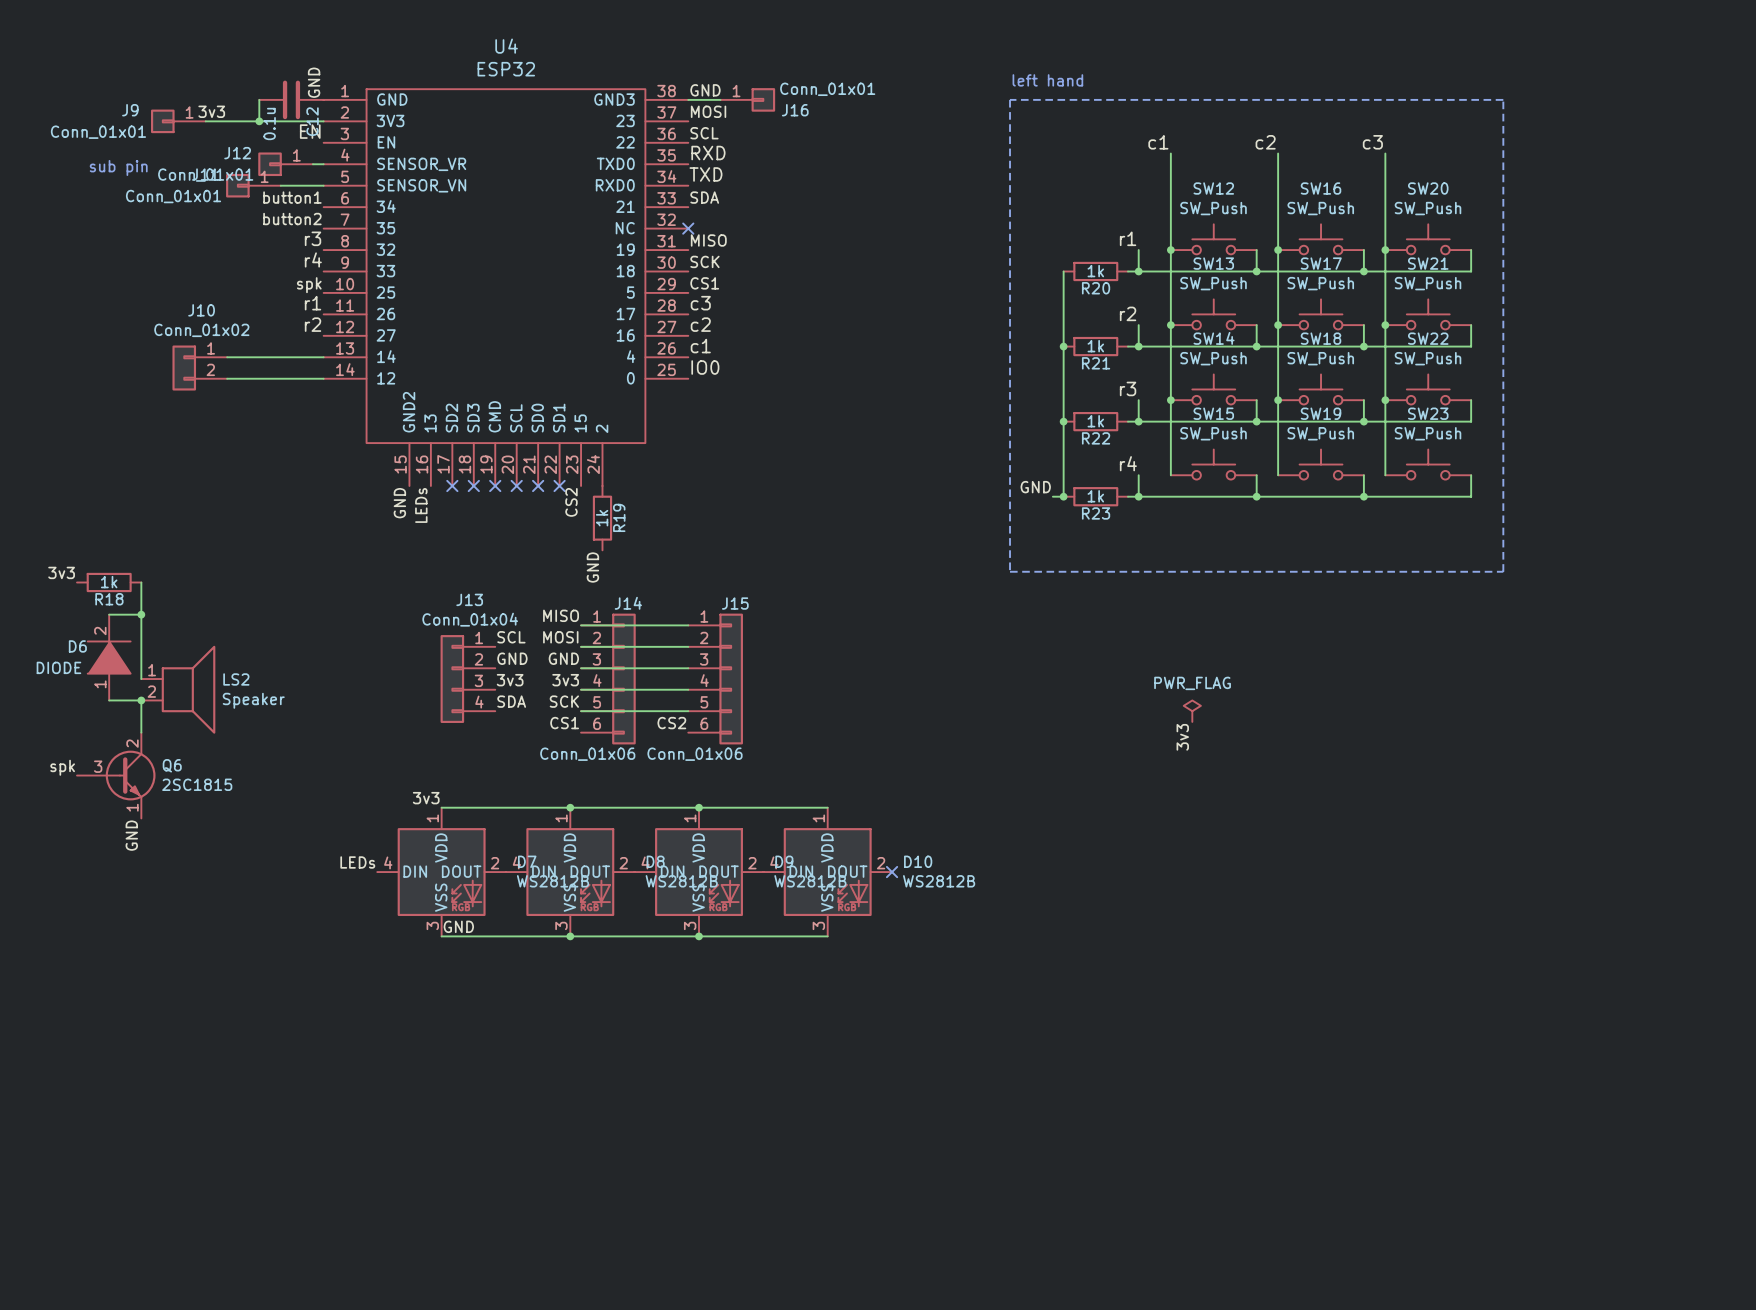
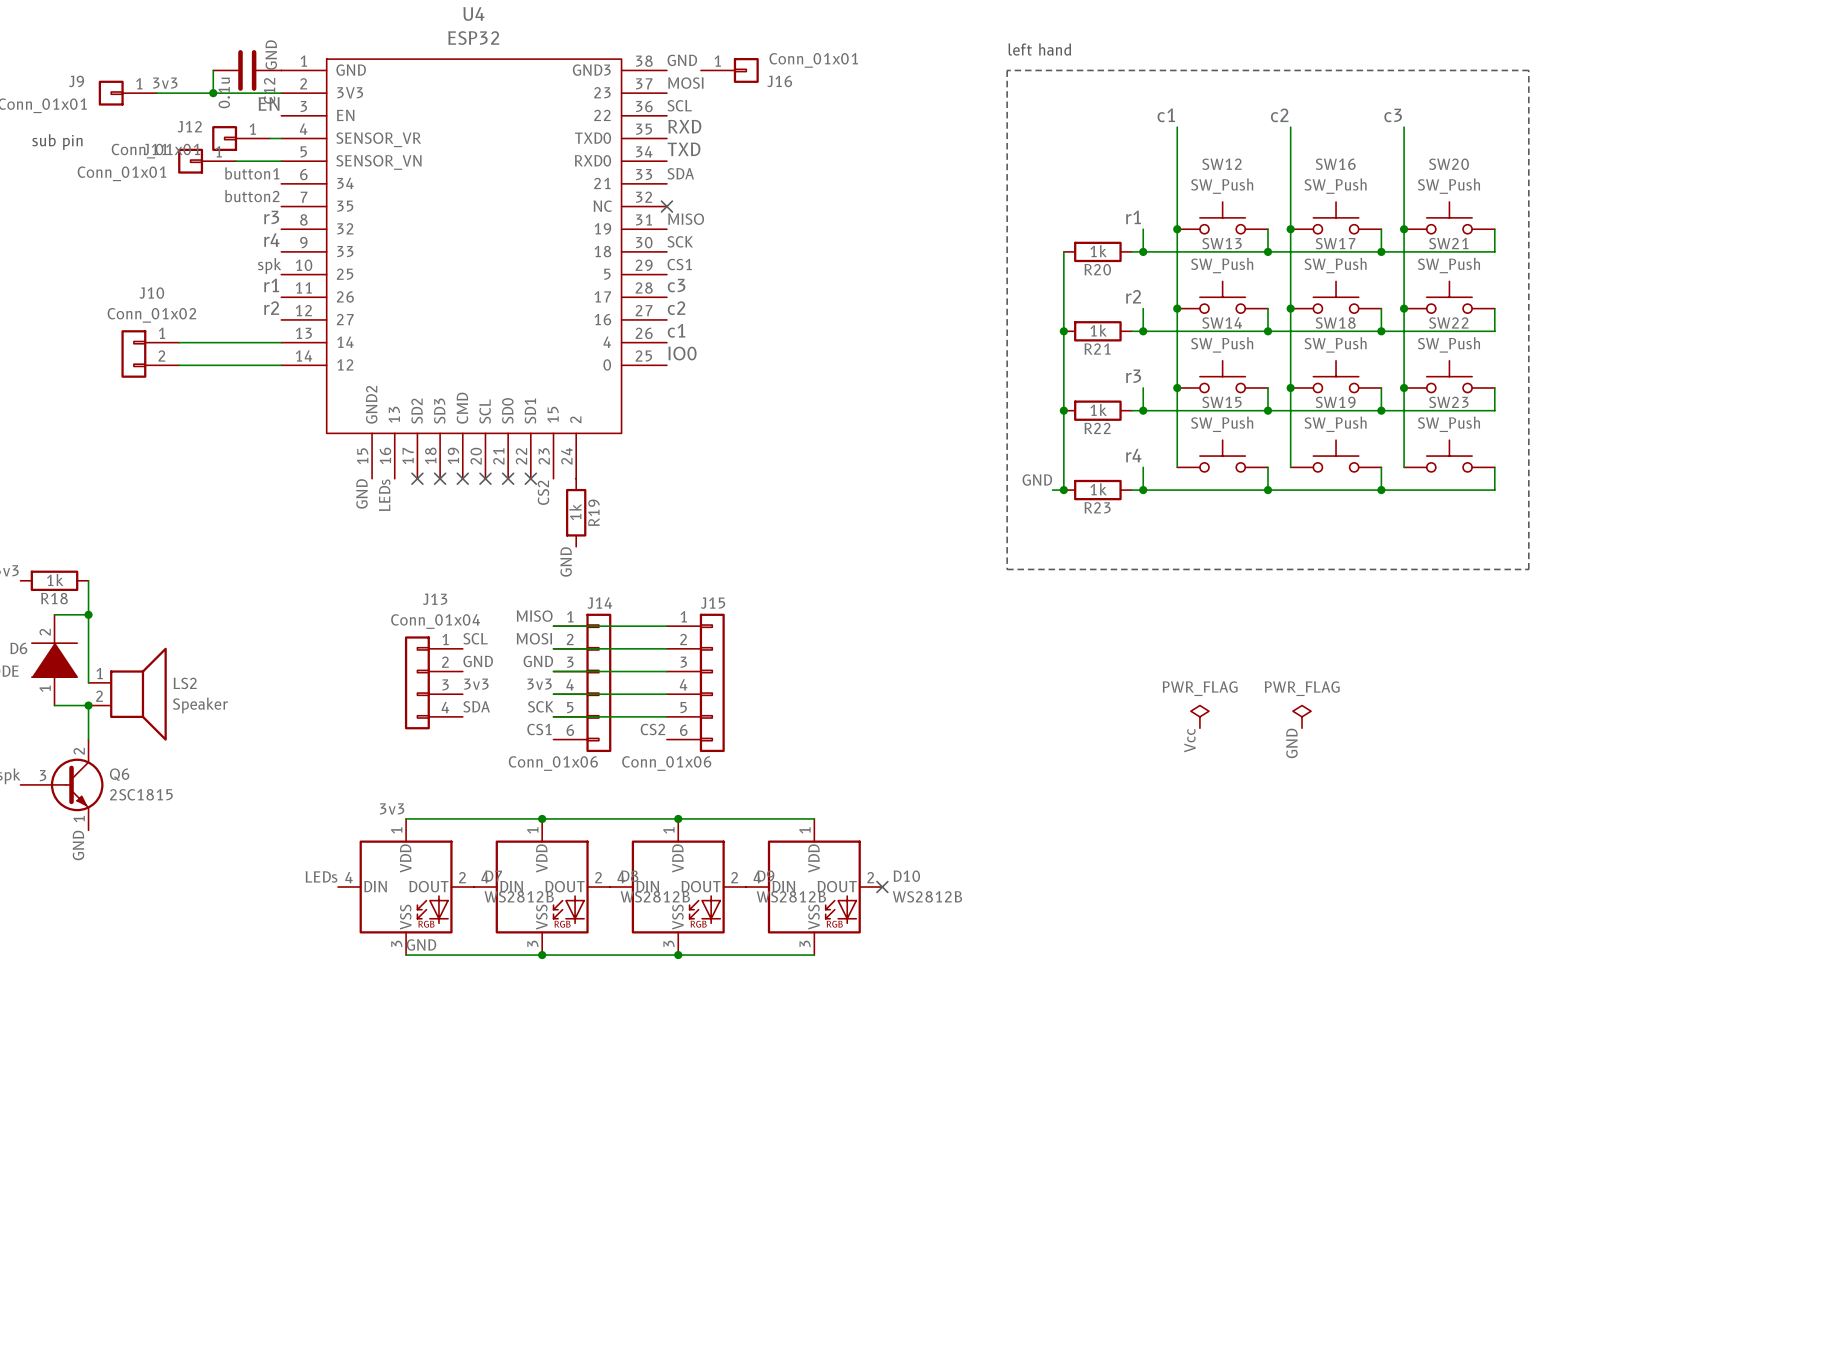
wire: (688, 99) (720, 99) -> none
power symbol: none -> PWR_FLAG (1302, 716)
label: 3v3 (1182, 737) -> Vcc (1189, 740)
label: none -> GND (1291, 743)

